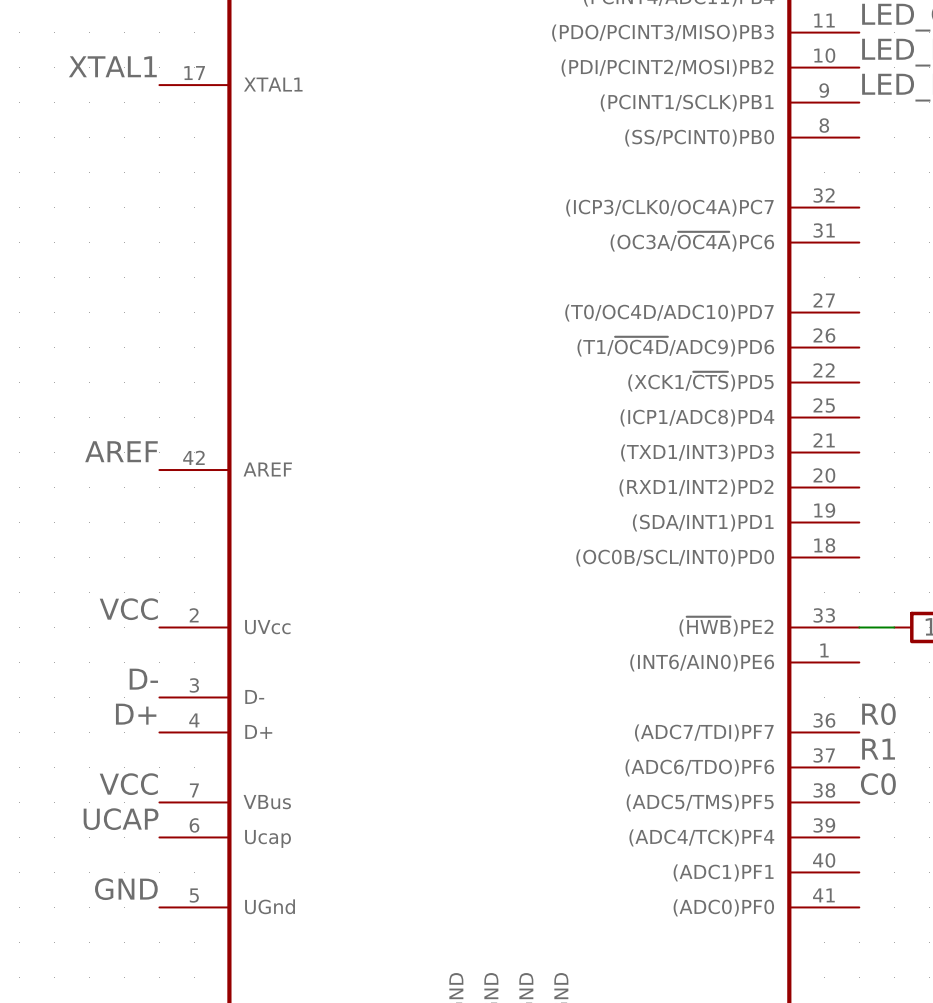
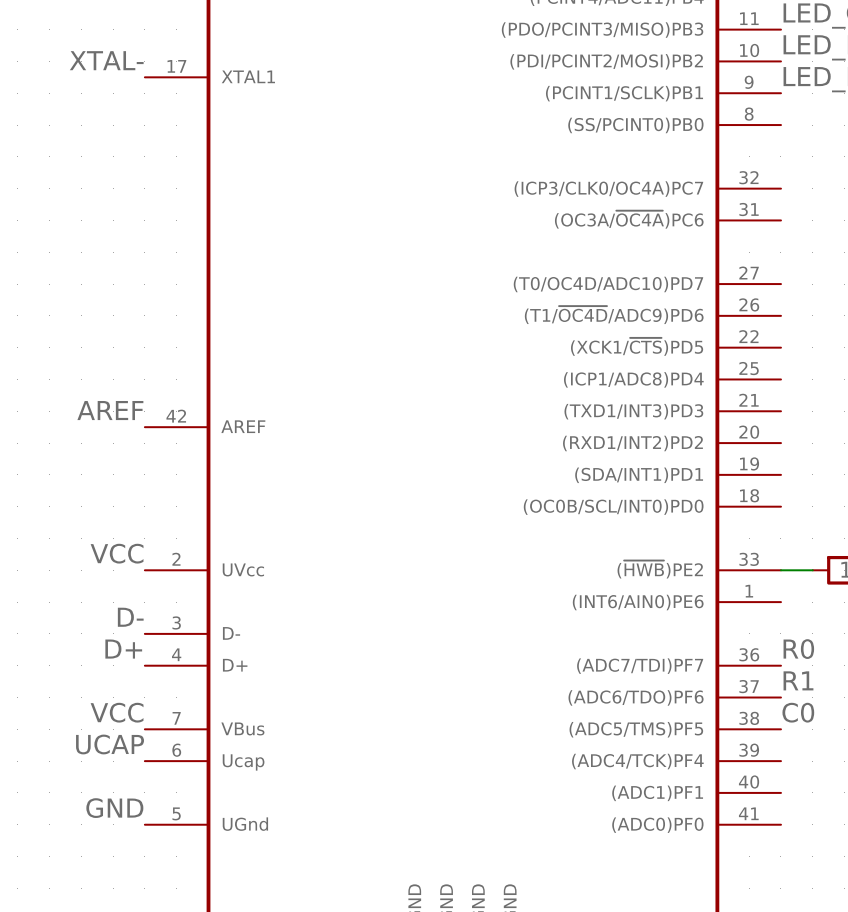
label: XTAL1 (112, 66) -> XTAL- (106, 60)

